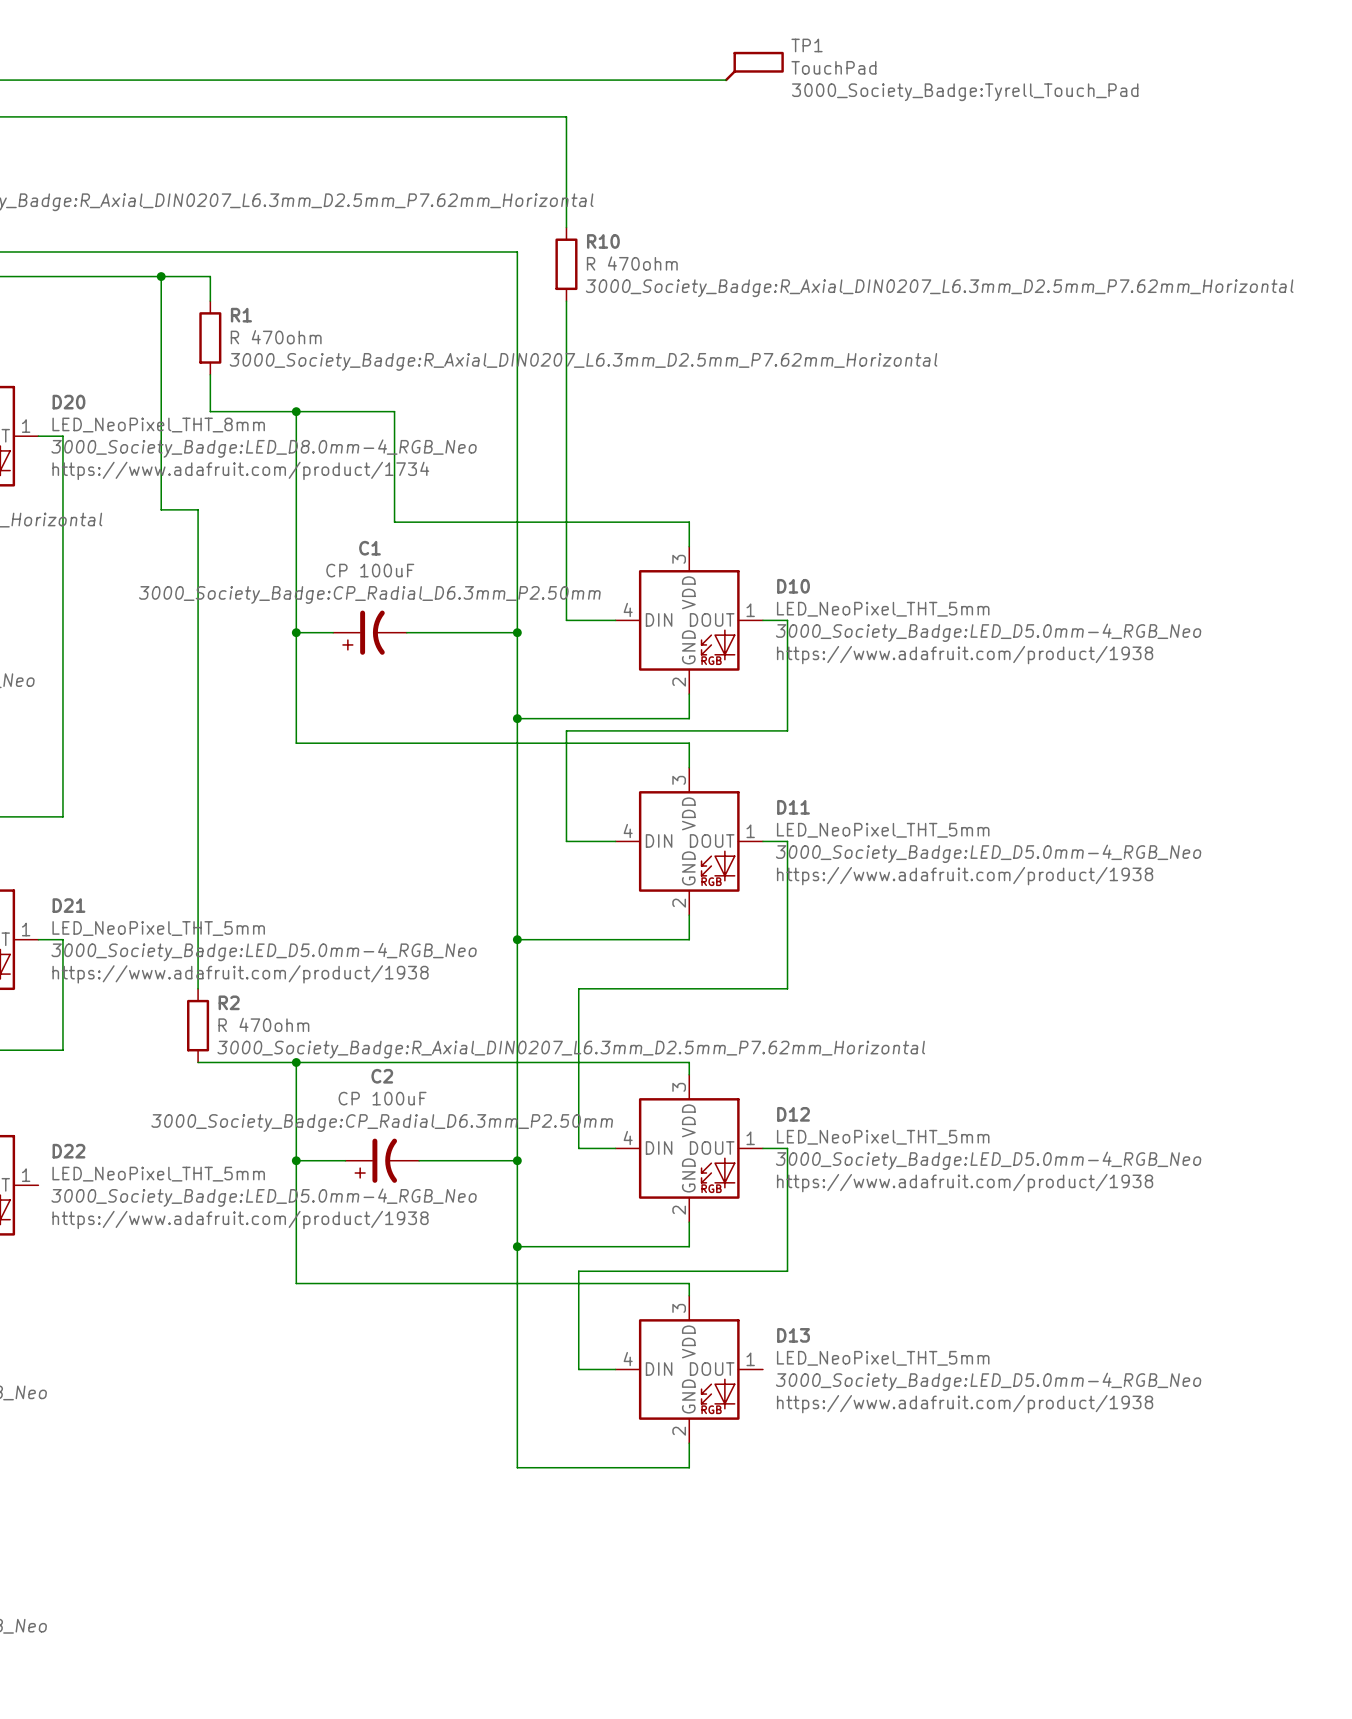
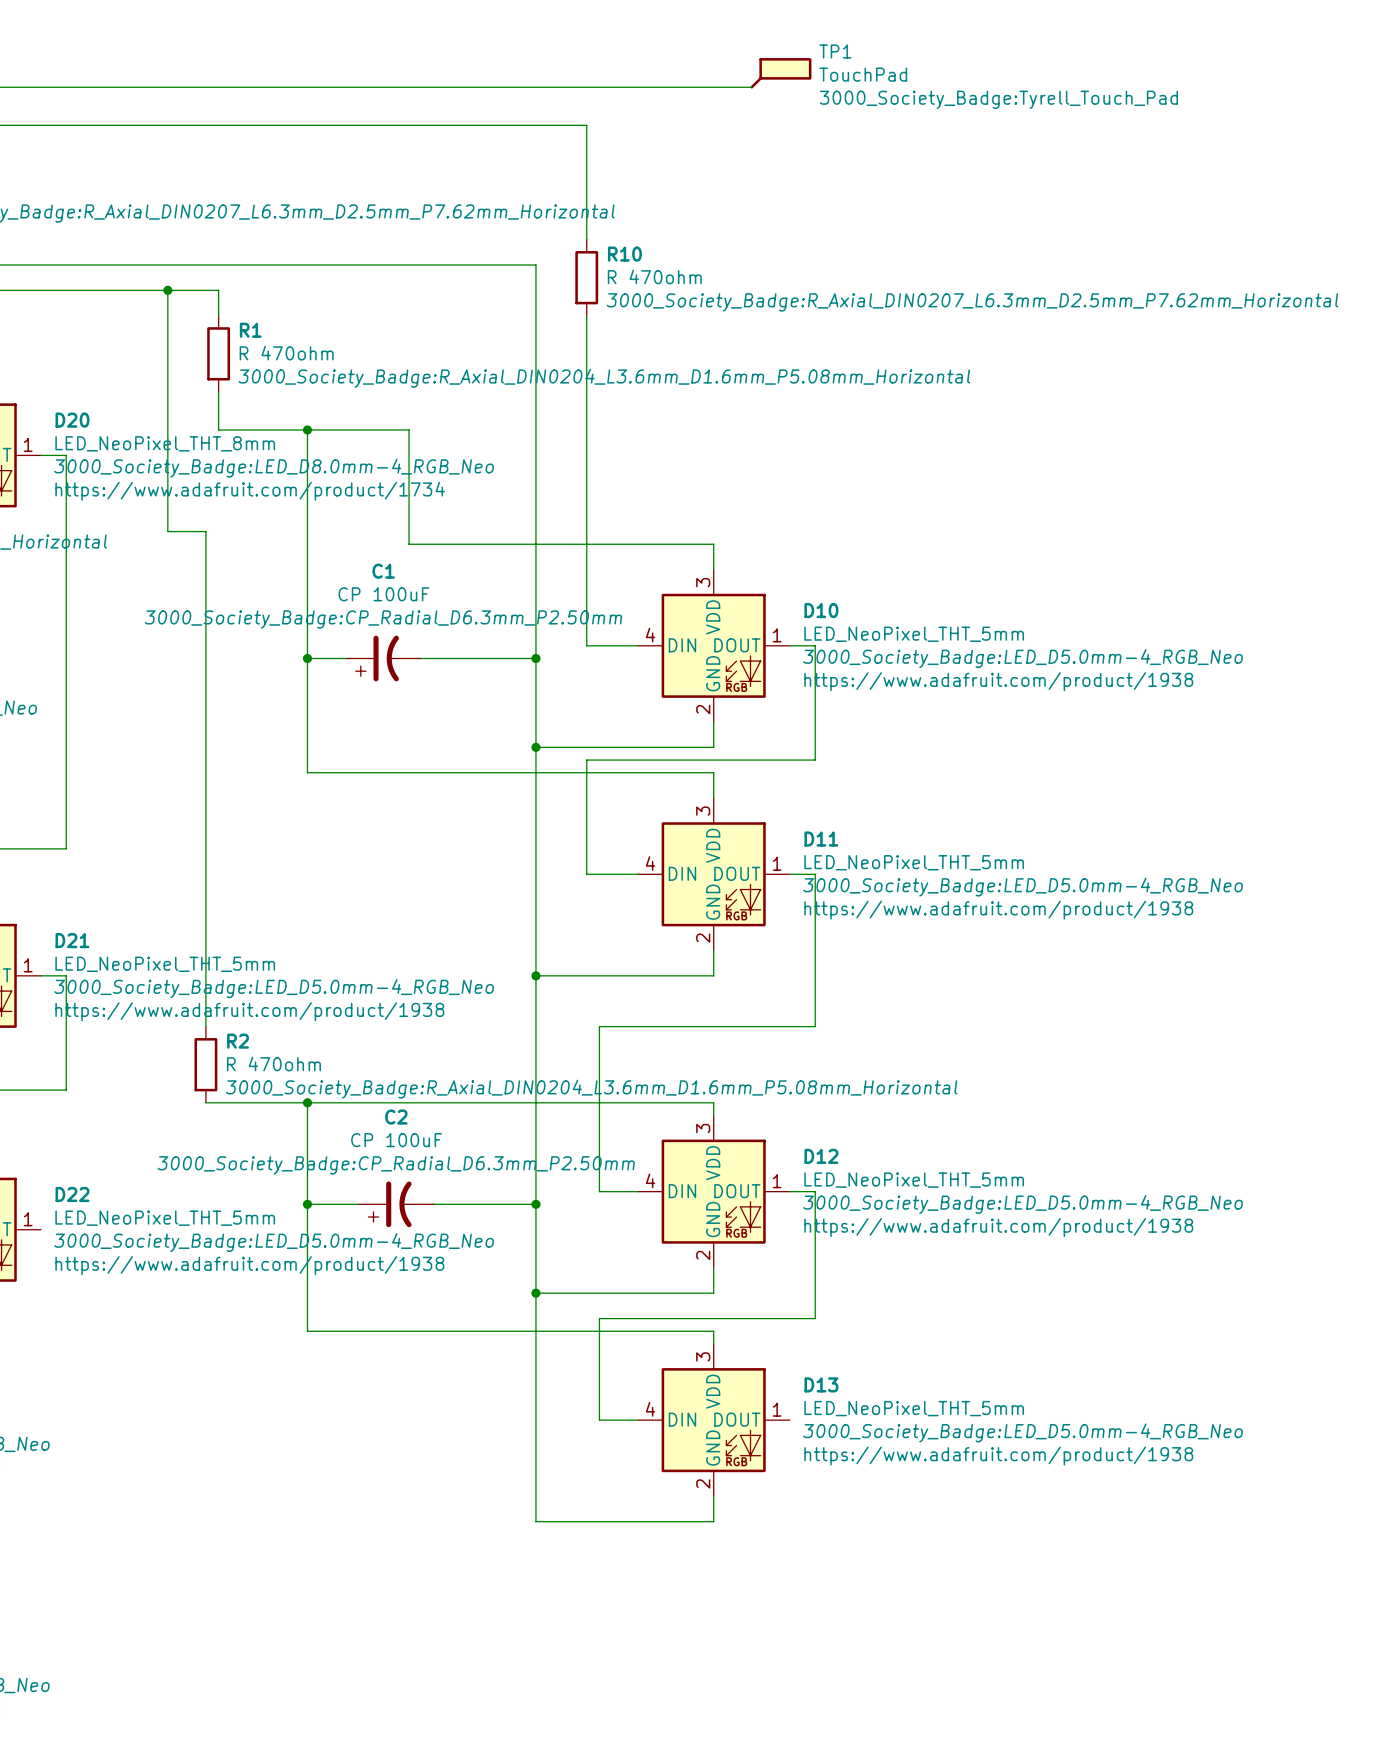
R1 text: 3000_Society_Badge:R_Axial_DIN0207_L6.3mm_D2.5mm_P7.62mm_Horizontal (583, 361) -> 3000_Society_Badge:R_Axial_DIN0204_L3.6mm_D1.6mm_P5.08mm_Horizontal (604, 378)
R2 text: 3000_Society_Badge:R_Axial_DIN0207_L6.3mm_D2.5mm_P7.62mm_Horizontal (571, 1049) -> 3000_Society_Badge:R_Axial_DIN0204_L3.6mm_D1.6mm_P5.08mm_Horizontal (591, 1089)

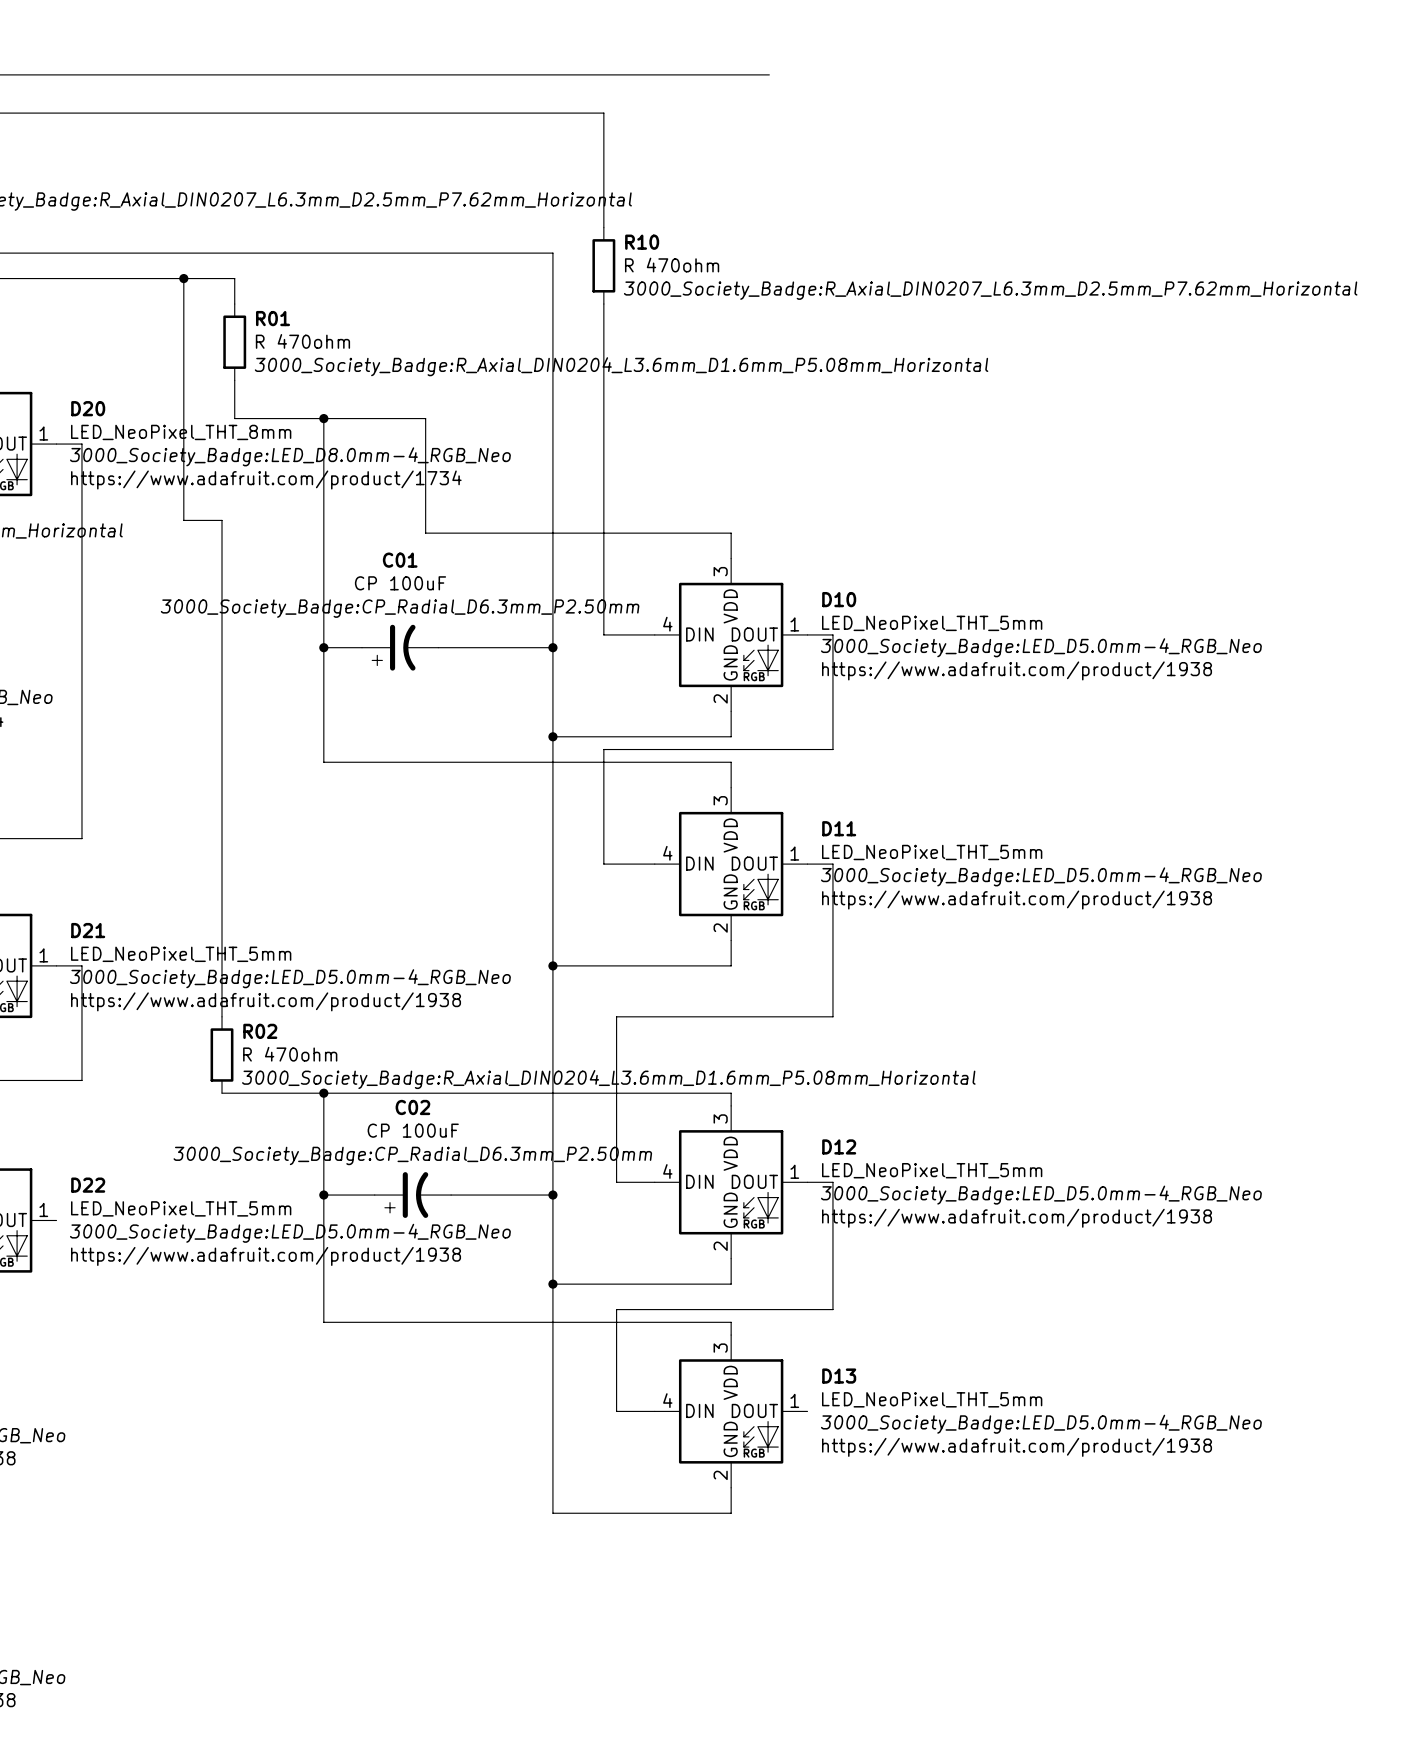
TP1: TouchPad (780, 73) -> none
R1 name: R1 (250, 330) -> R01 (273, 318)
C1 name: C1 (383, 571) -> C01 (400, 560)
R2 name: R2 (238, 1041) -> R02 (260, 1031)
C2 name: C2 (396, 1117) -> C02 (412, 1107)

